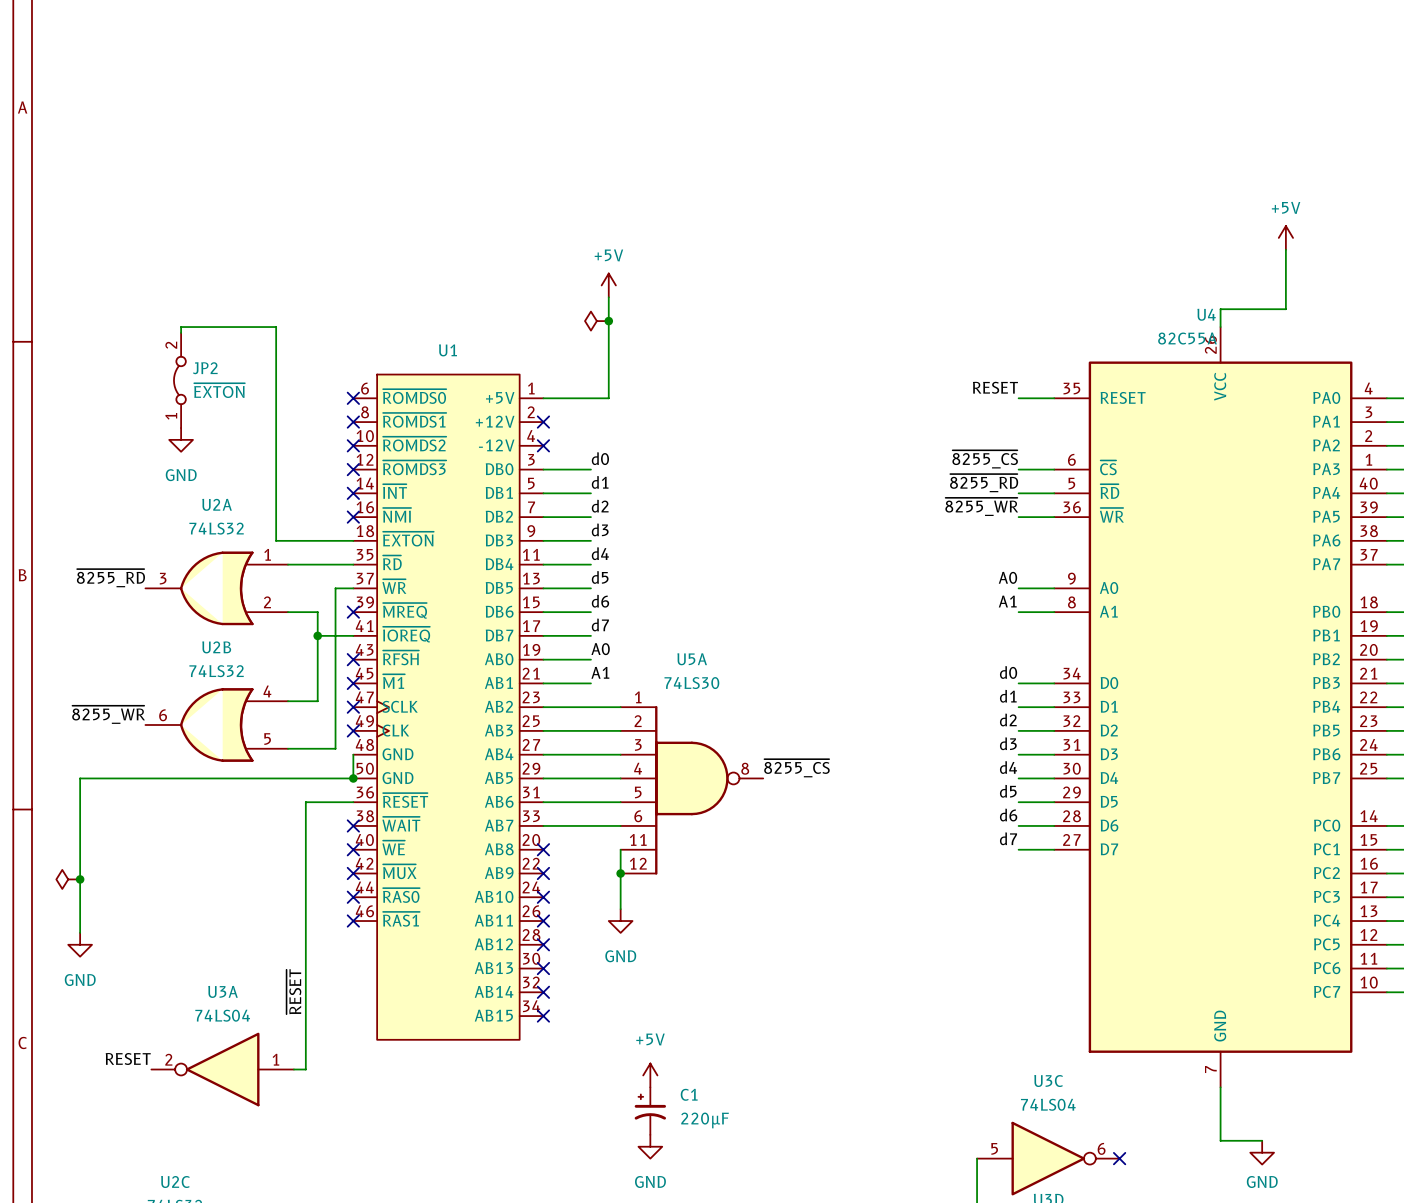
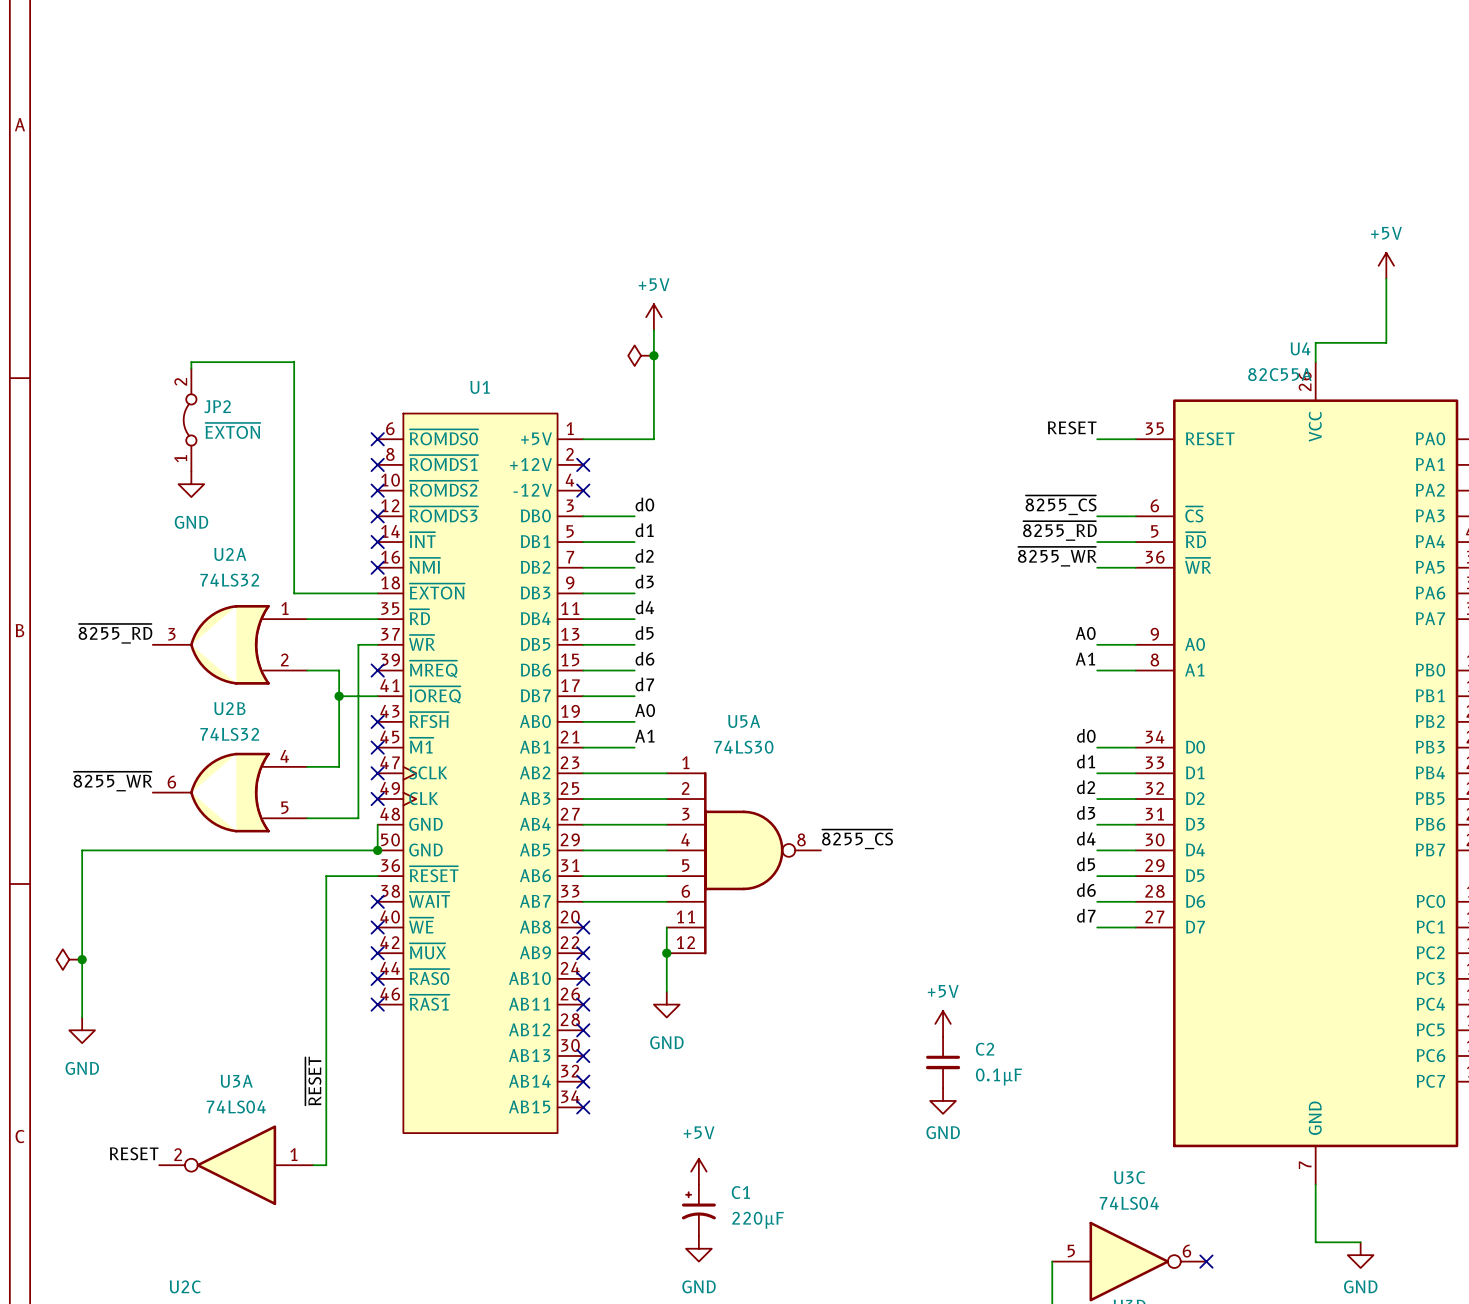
power symbol: none -> +5V (943, 1023)
C2: none -> 0.1µF (943, 1062)
power symbol: none -> GND (943, 1100)

